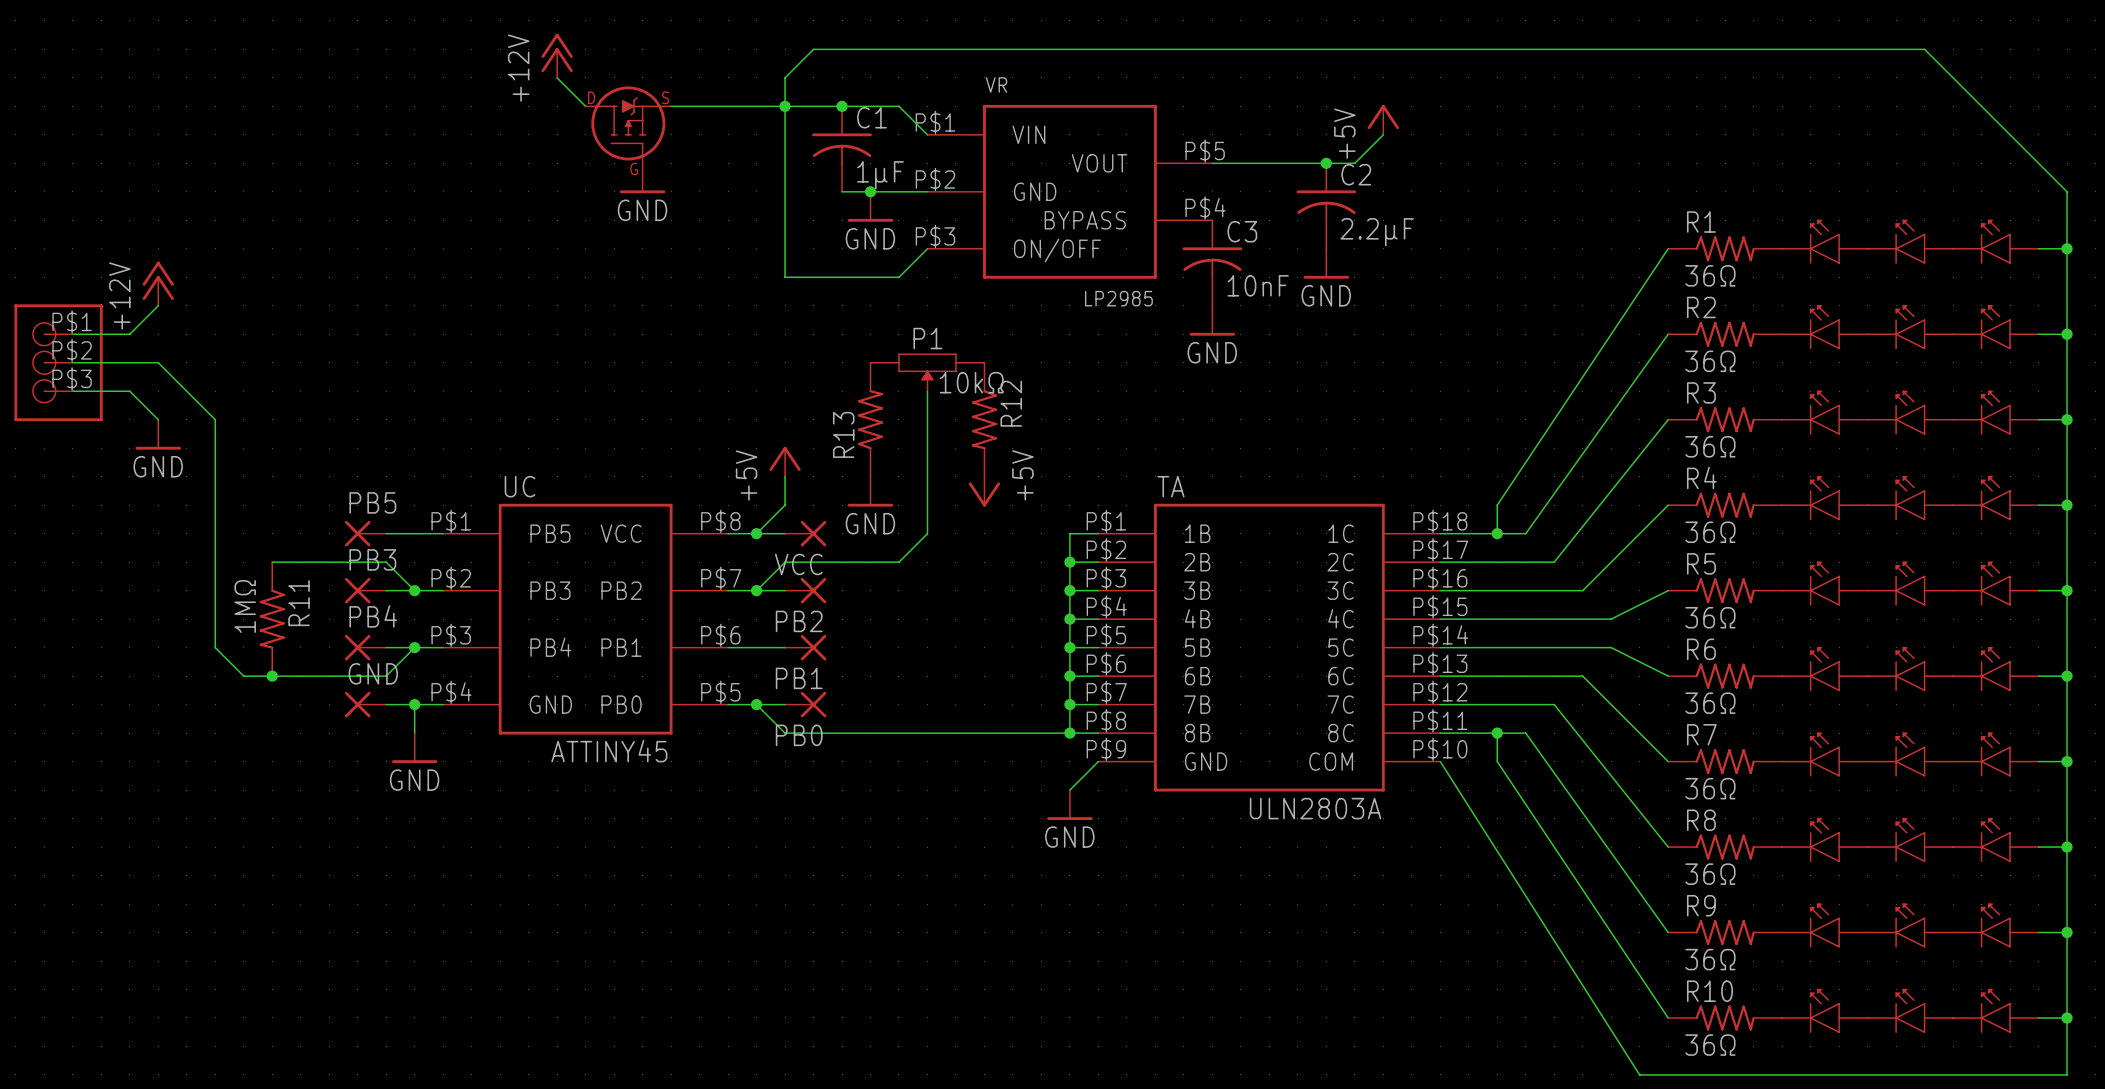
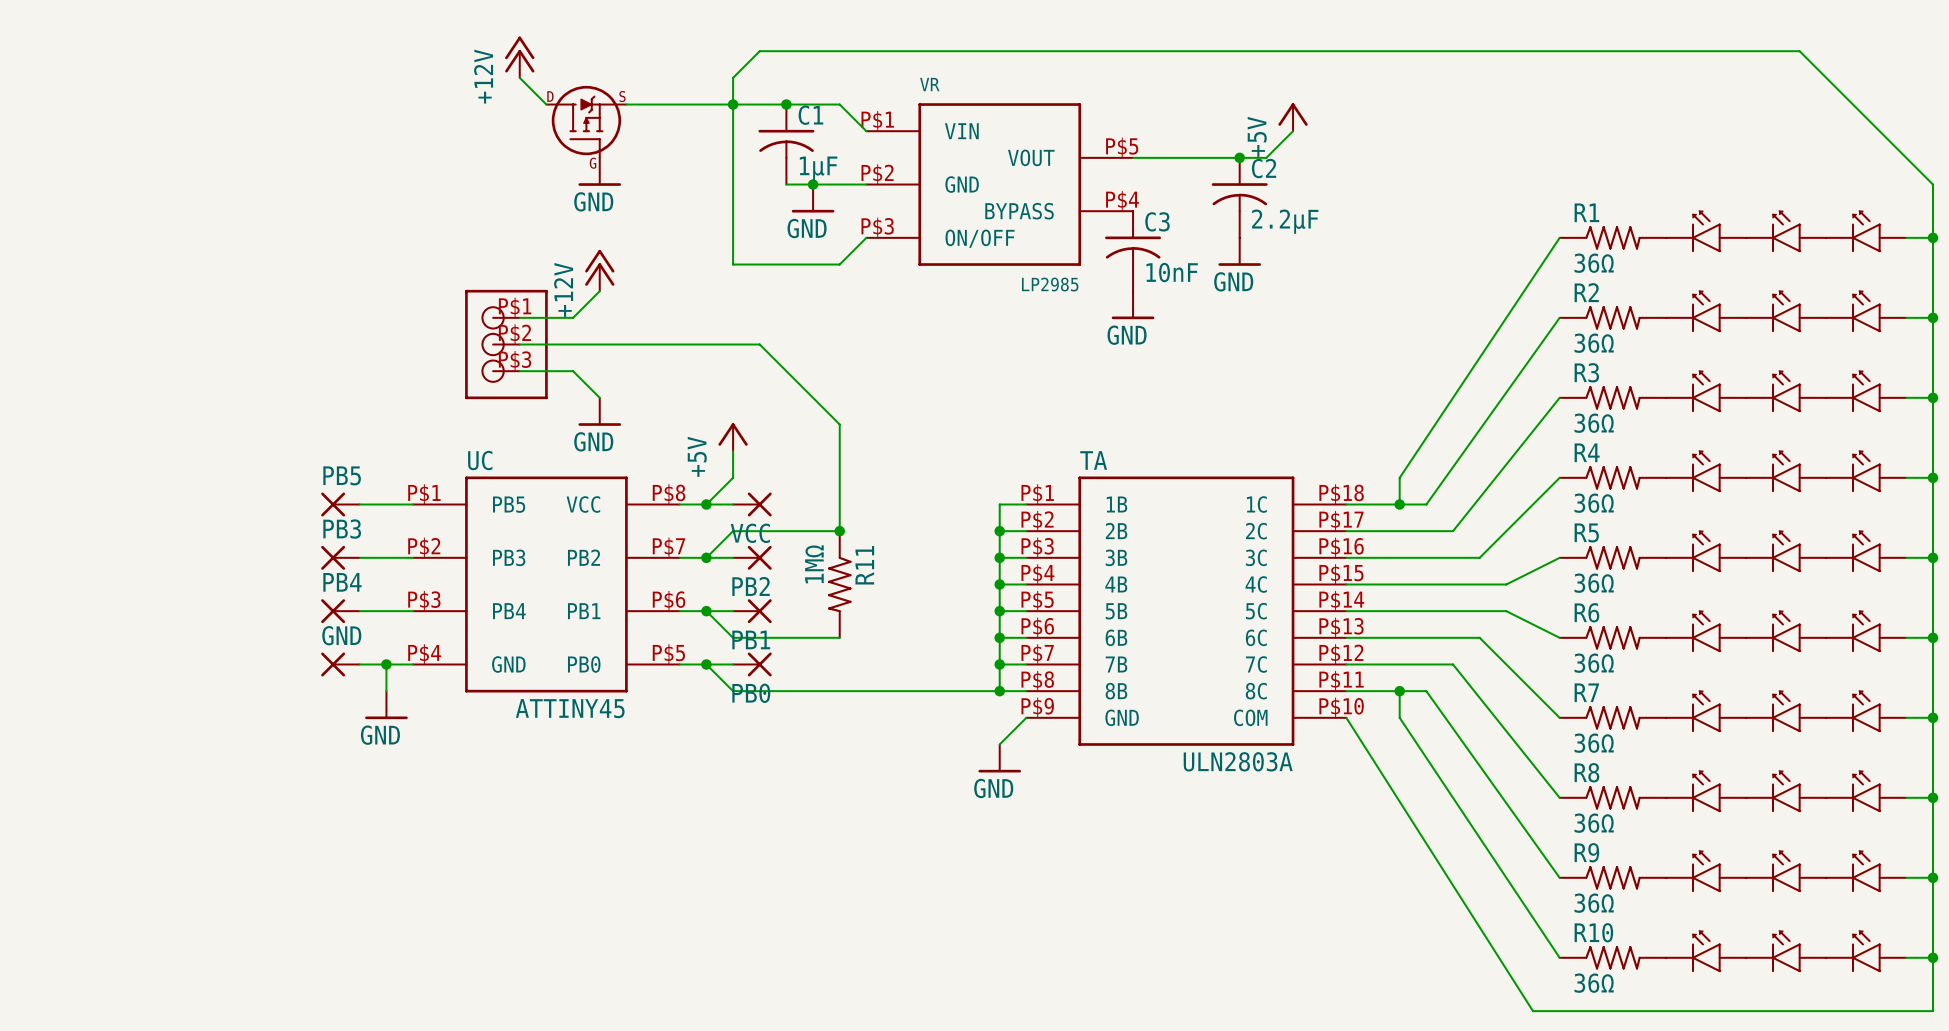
power symbol: +12V (158, 283) -> none
power symbol: none -> +12V (599, 270)
wire: (158, 305) (129, 334) (72, 334) -> none
wire: none -> (599, 291) (573, 317) (519, 317)
part: (58, 362) -> none
wire: (72, 362) (158, 362) (215, 419) (215, 647) (243, 676) (386, 676) (414, 647) -> none
part: none -> (506, 344)
P1: 10kΩ (927, 372) -> none
wire: (72, 391) (129, 391) (158, 419) -> none
wire: none -> (519, 371) (573, 371) (599, 397)
wire: (927, 391) (927, 533) (898, 562) -> (519, 344) (759, 344) (839, 424) (839, 531)
R13: (870, 419) -> none
R12: (984, 419) -> none
power symbol: GND (158, 434) -> none
power symbol position: GND (870, 491) -> GND (599, 411)
power symbol: +5V (984, 491) -> none
wire: (272, 562) (386, 562) (414, 590) -> none
junction: none -> (839, 531)
junction: (414, 590) -> none
R11 position: (272, 619) -> (839, 584)
junction: (414, 647) -> none
wire: none -> (706, 611) (733, 637) (839, 637)
junction: none -> (706, 611)
junction: (272, 676) -> none

